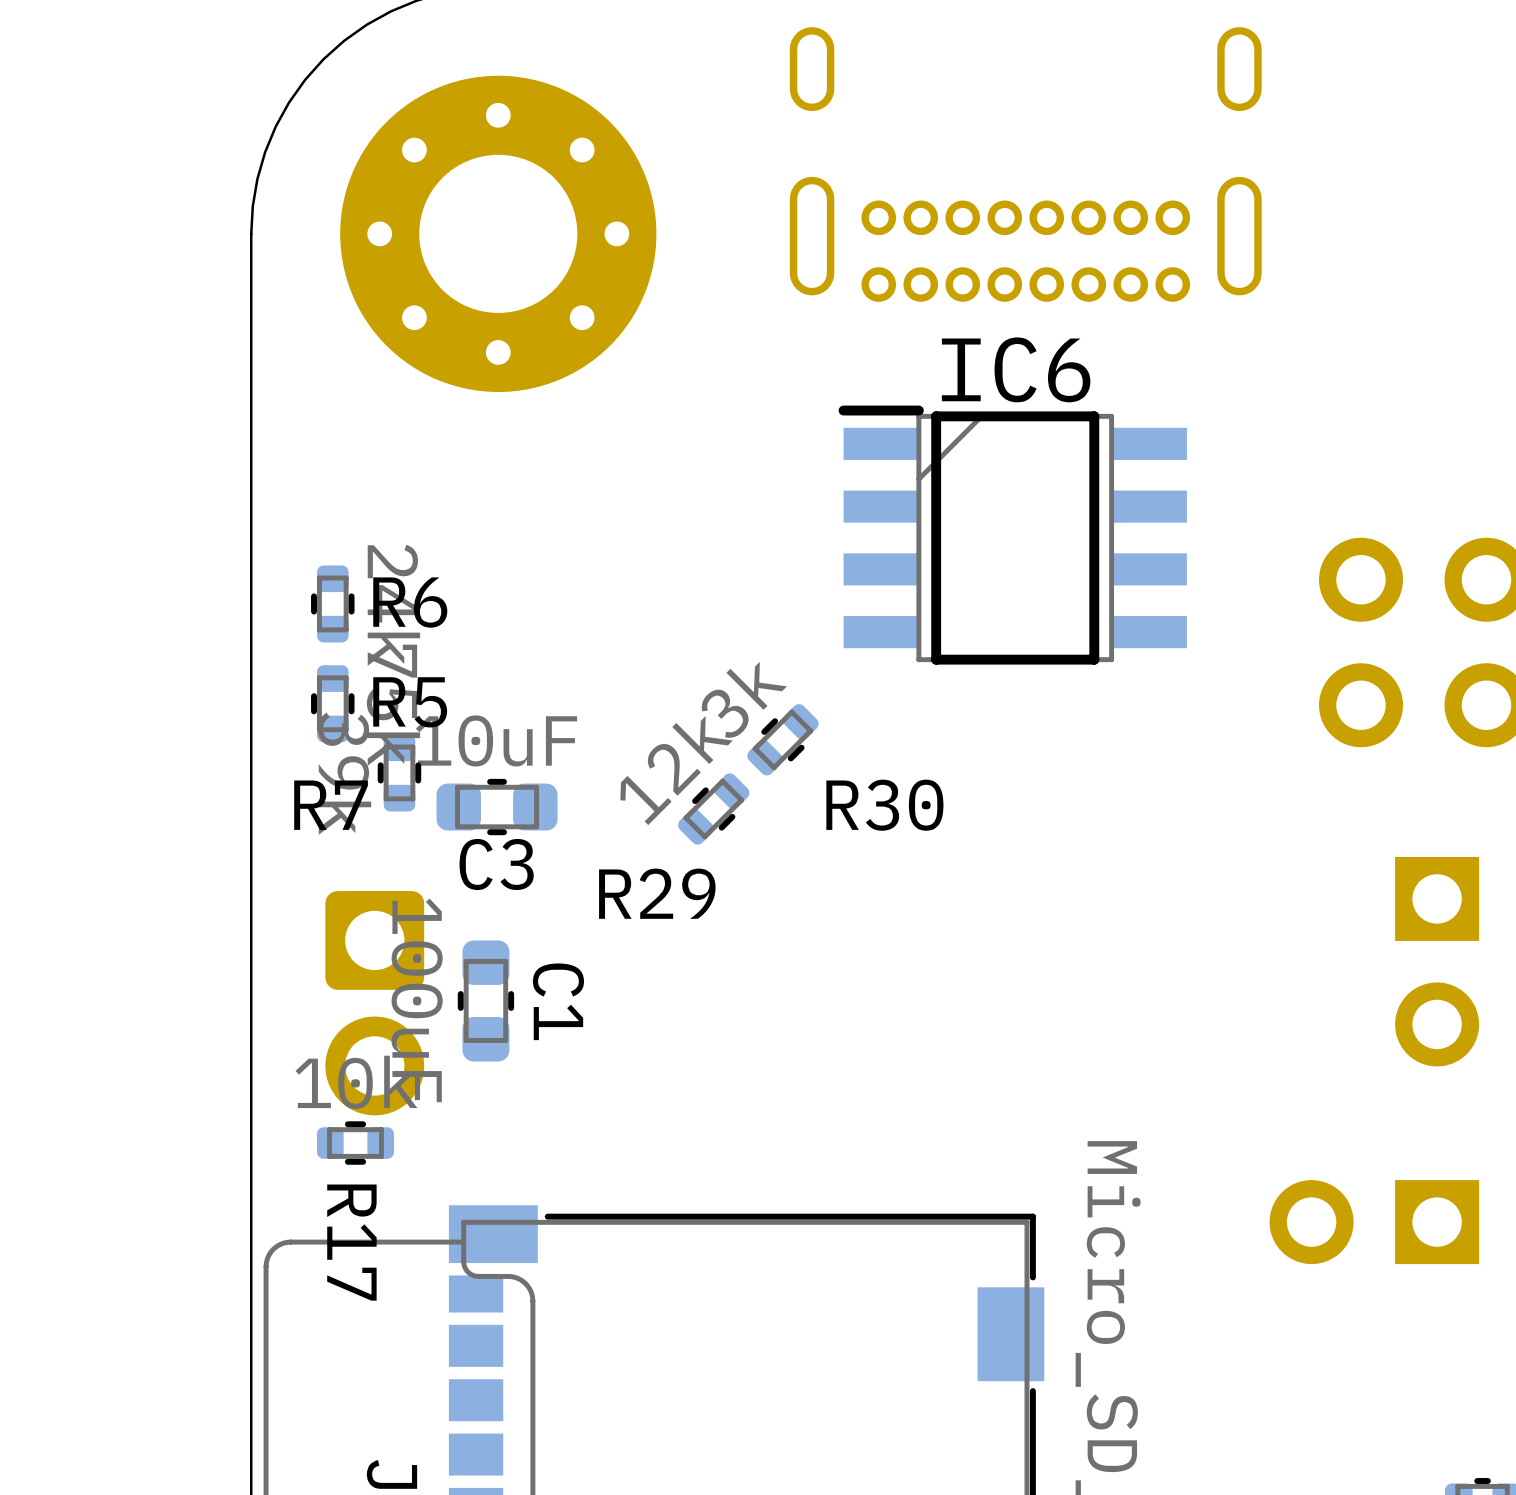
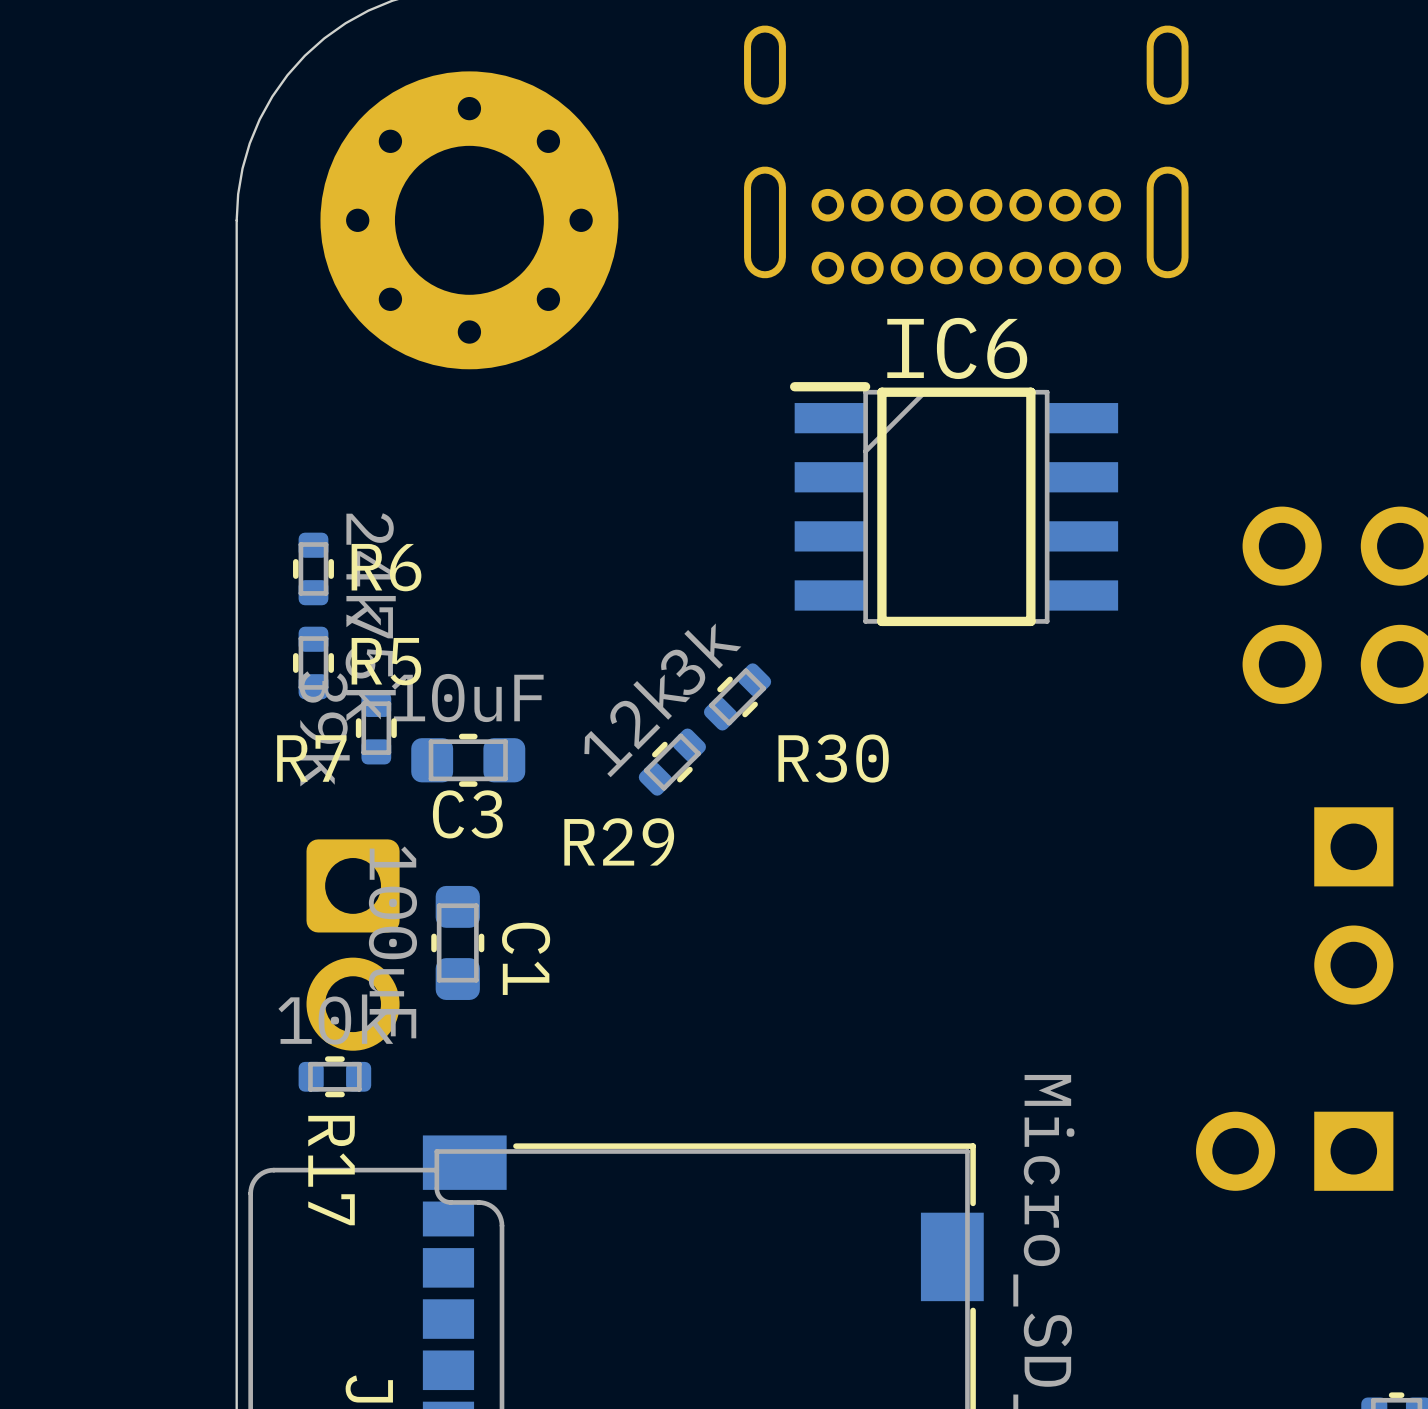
C1 name position: C1 (558, 1001) -> C1 (526, 958)

